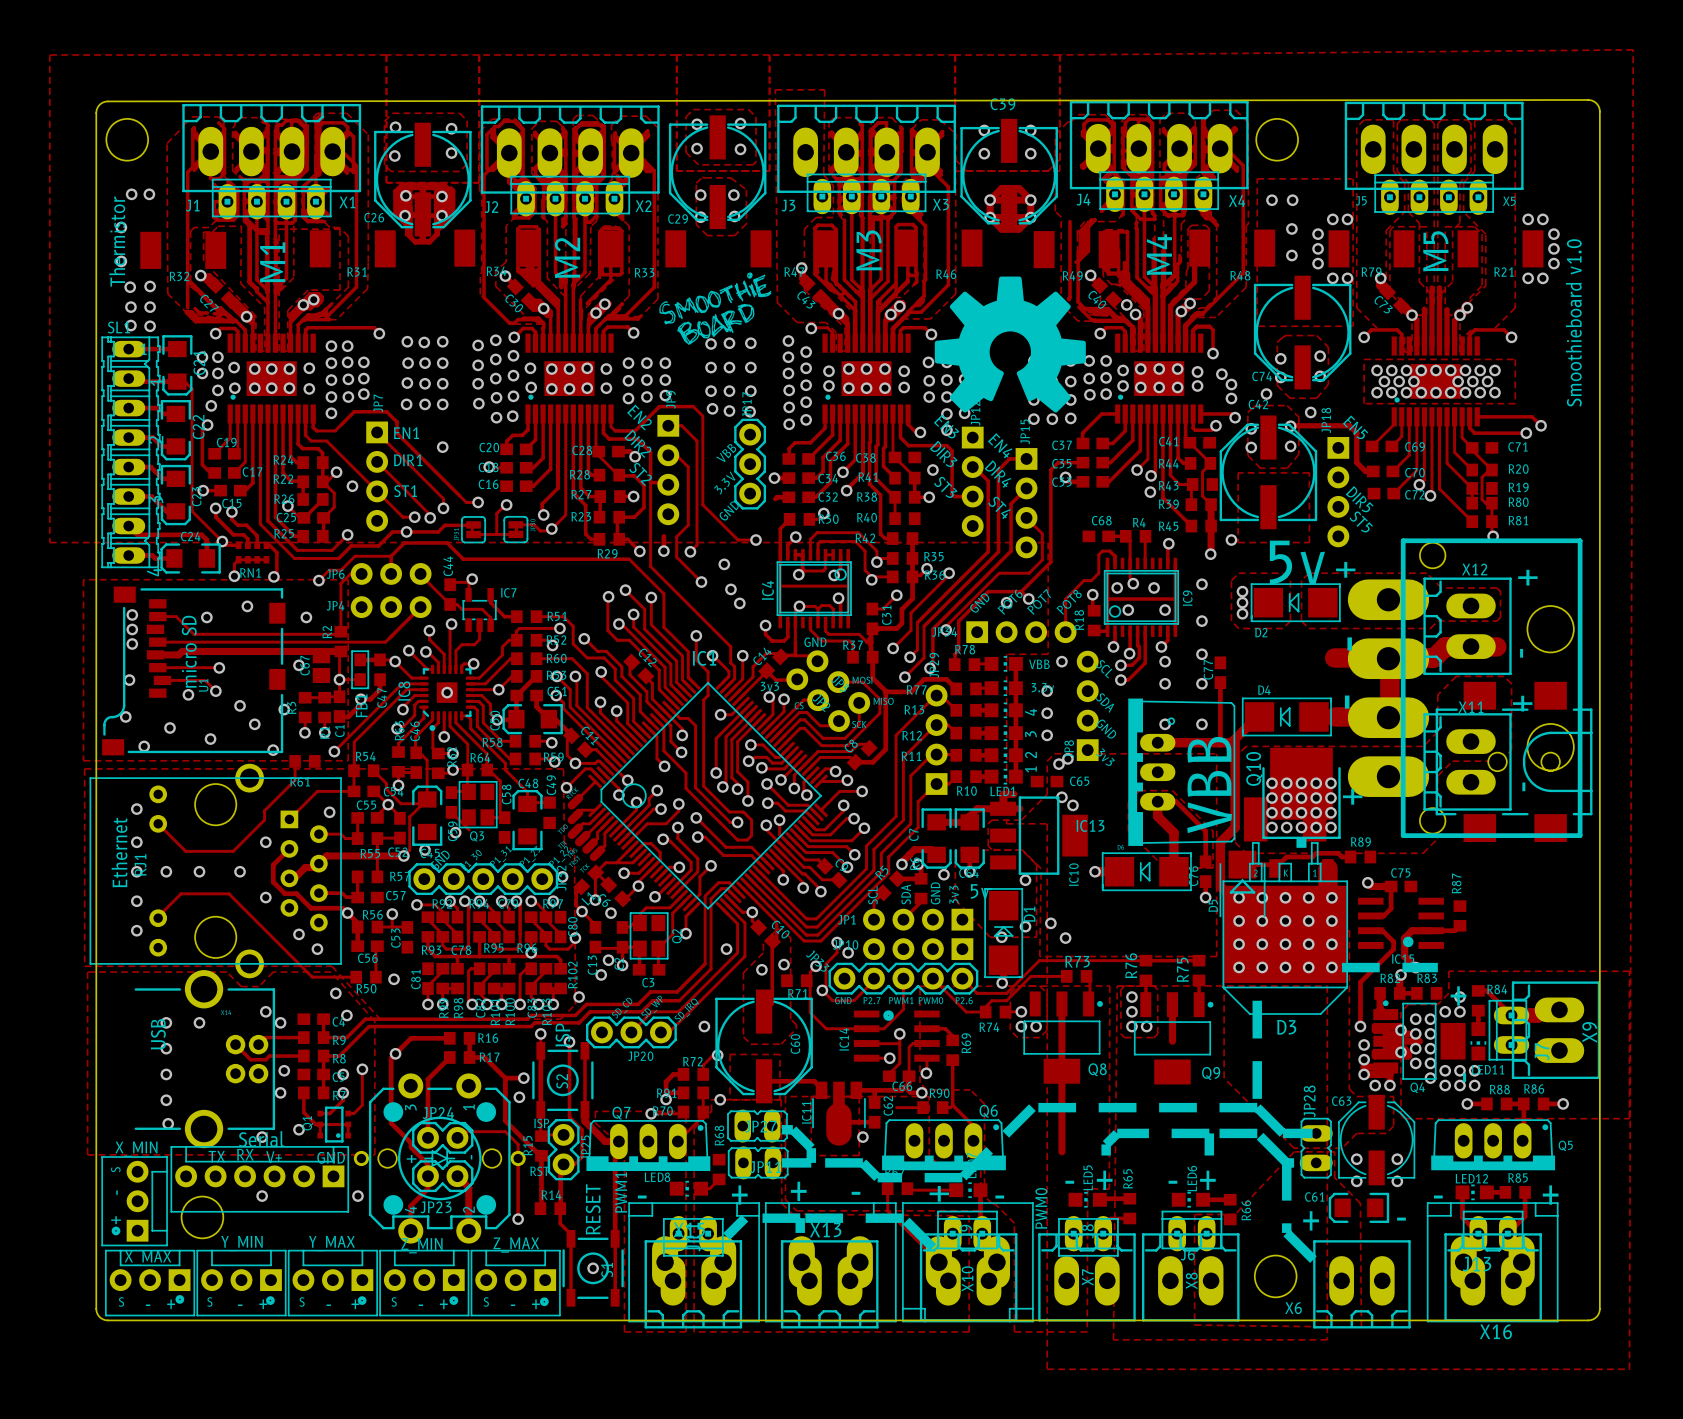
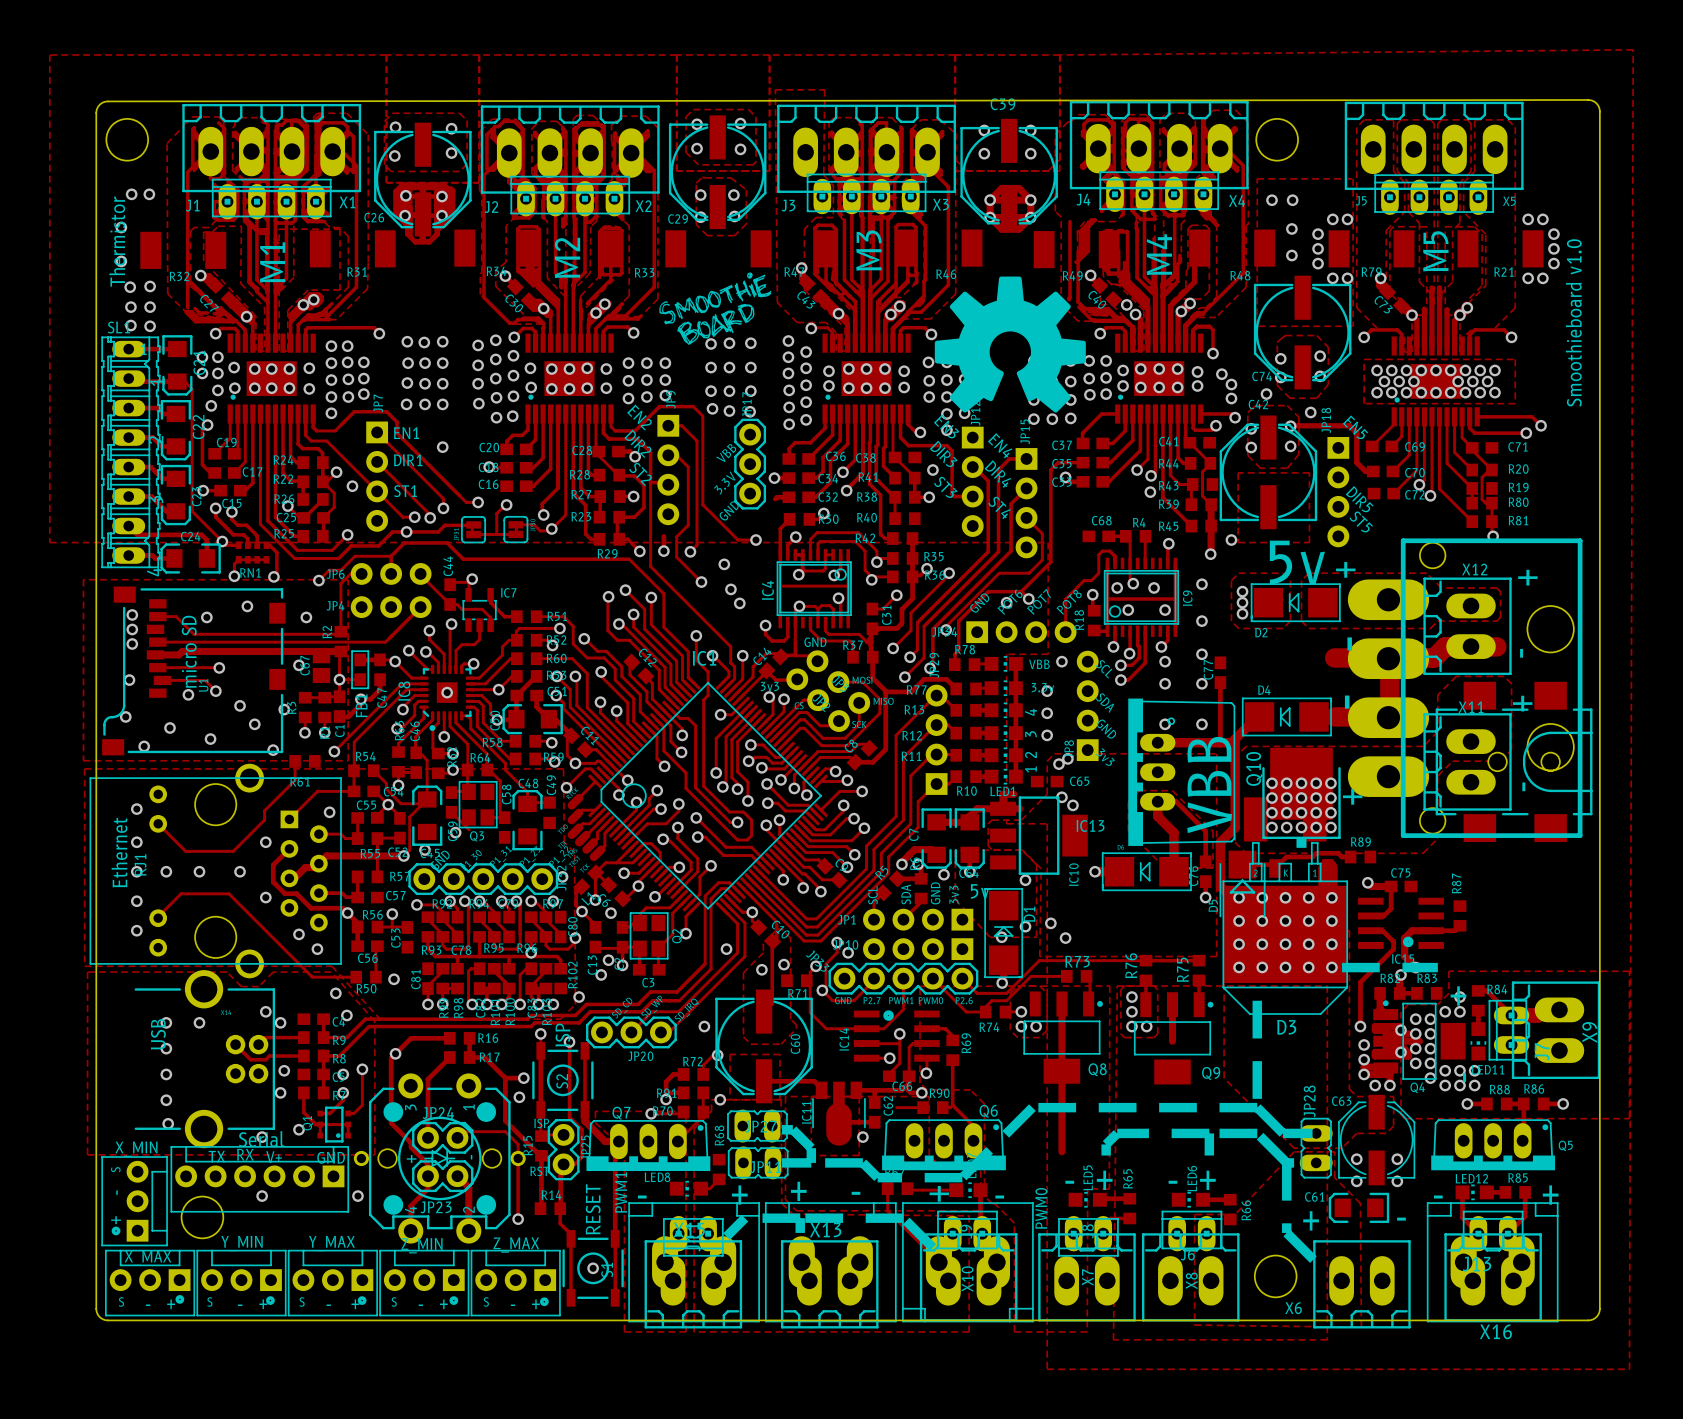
track: (494, 971) (479, 986) (479, 993) (486, 1000) -> (494, 971) (509, 986) (509, 997) (501, 1004)
track: none -> (486, 988) (486, 1000)
track: (501, 988) (501, 1004) -> none
track: (553, 988) (553, 1004) -> (538, 988) (538, 1004)

